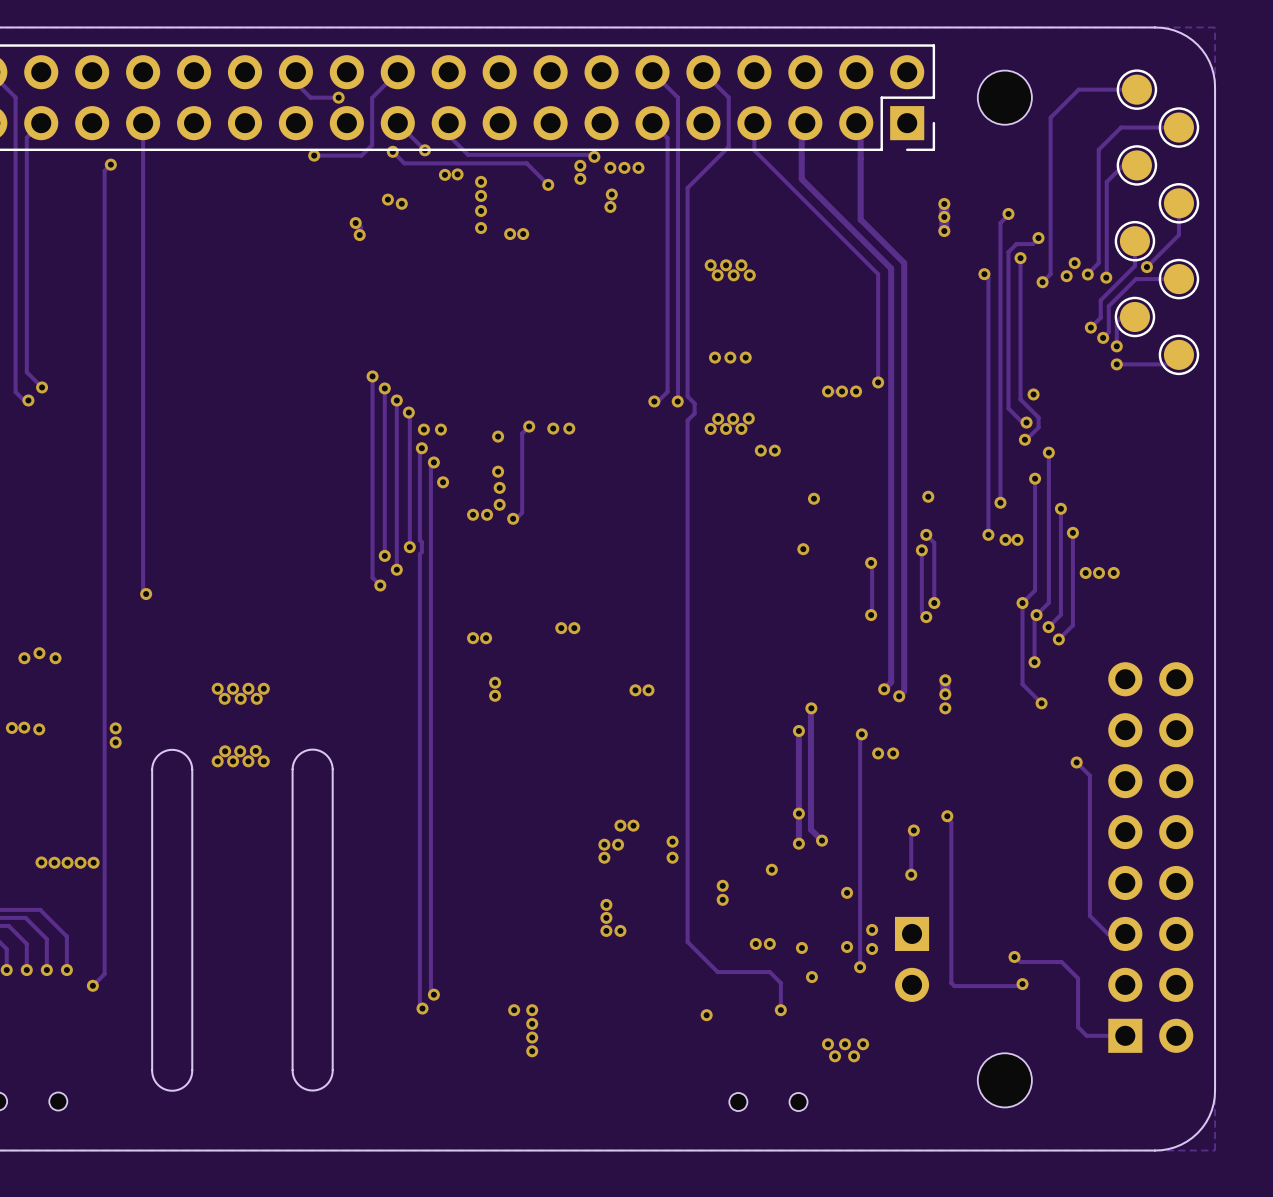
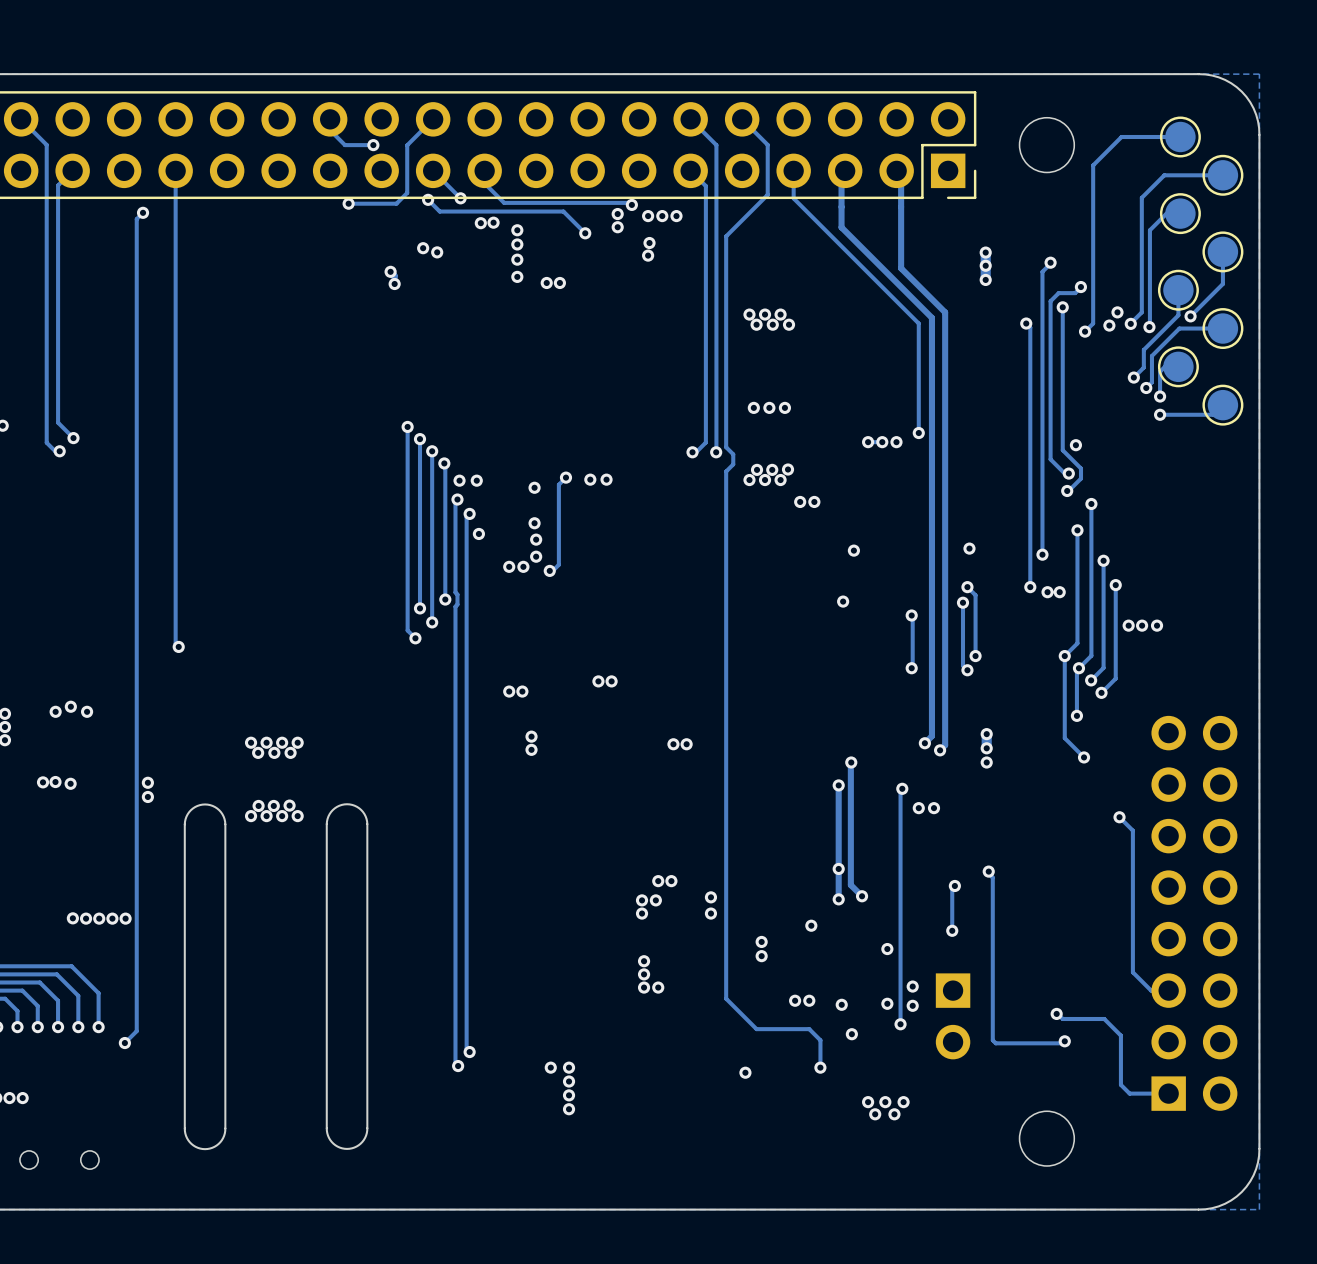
part: (768, 1102) -> none

